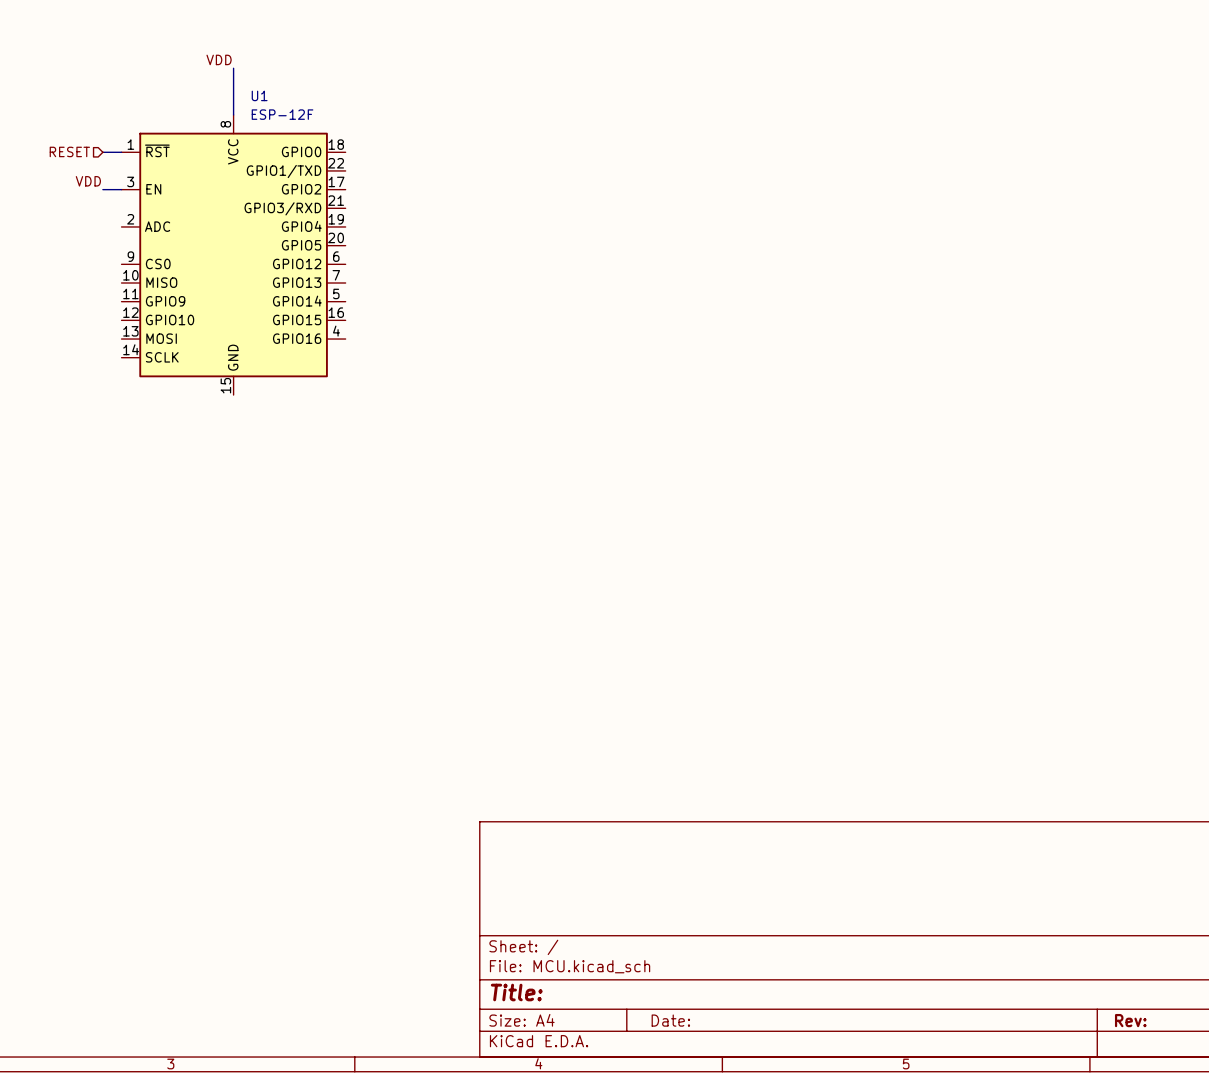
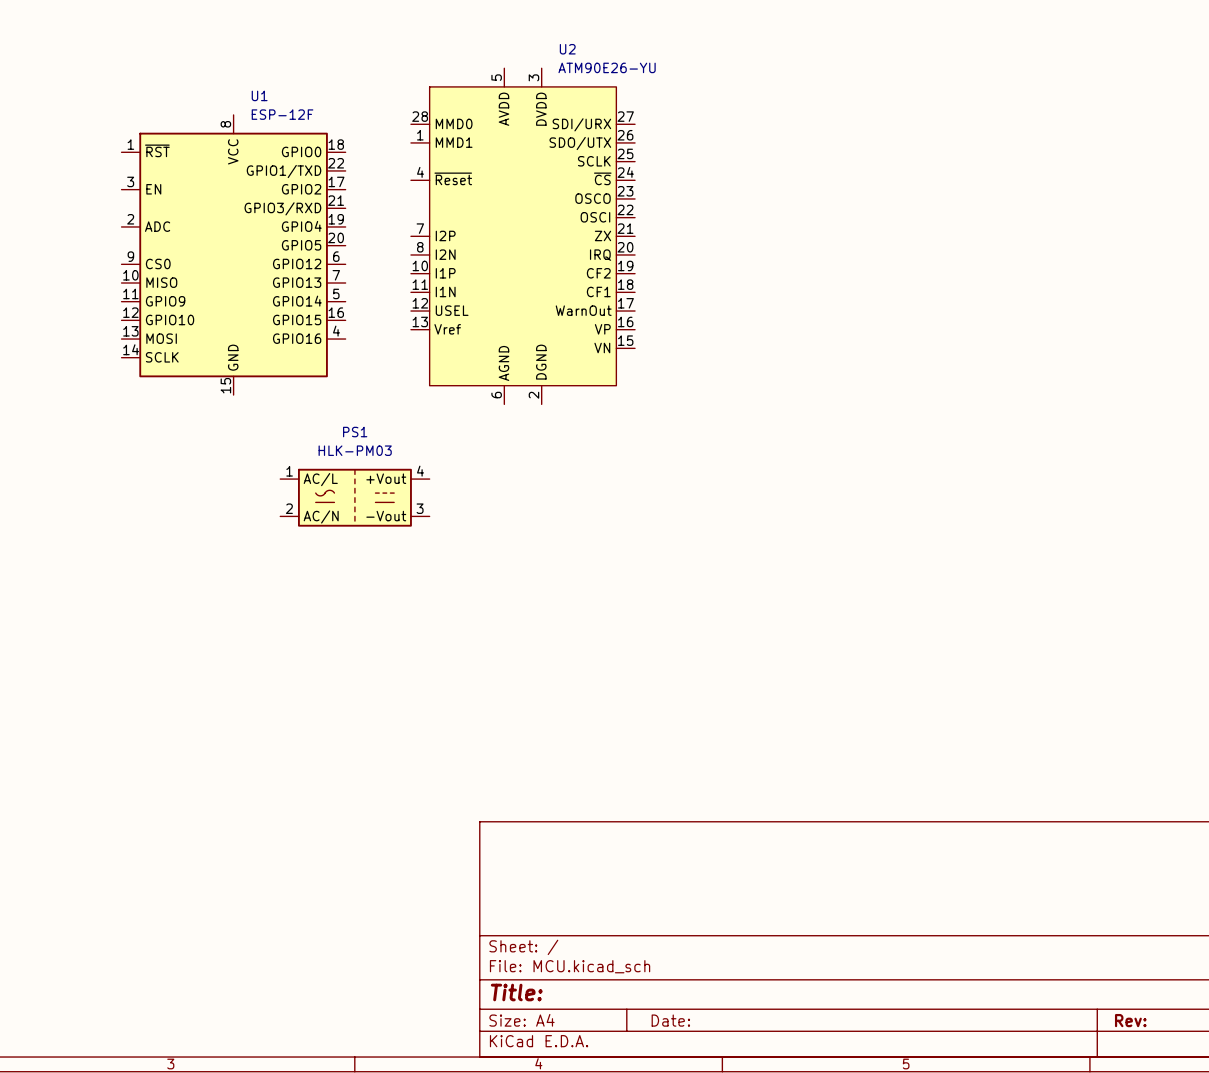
label: VDD (219, 59) -> none
wire: (233, 68) (233, 114) -> none
hierarchical label: RESET (69, 151) -> none
wire: (102, 152) (121, 152) -> none
label: VDD (88, 181) -> none
wire: (102, 189) (121, 189) -> none
U2: none -> ATM90E26-YU (523, 236)
PS1: none -> HLK-PM03 (354, 497)

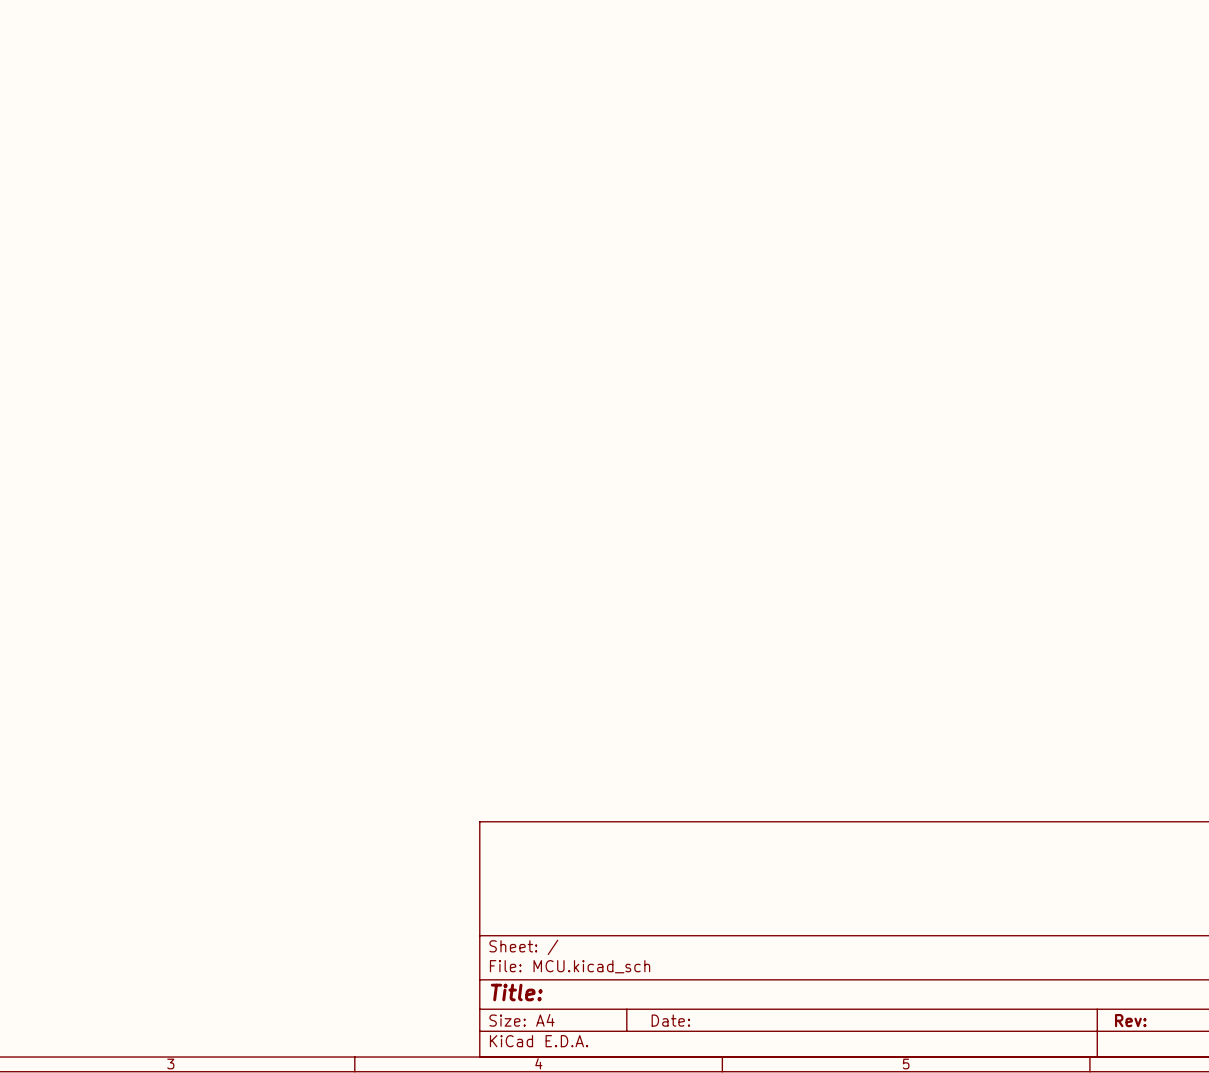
U2: ATM90E26-YU (523, 236) -> none
U1: ESP-12F (233, 254) -> none
PS1: HLK-PM03 (354, 497) -> none

